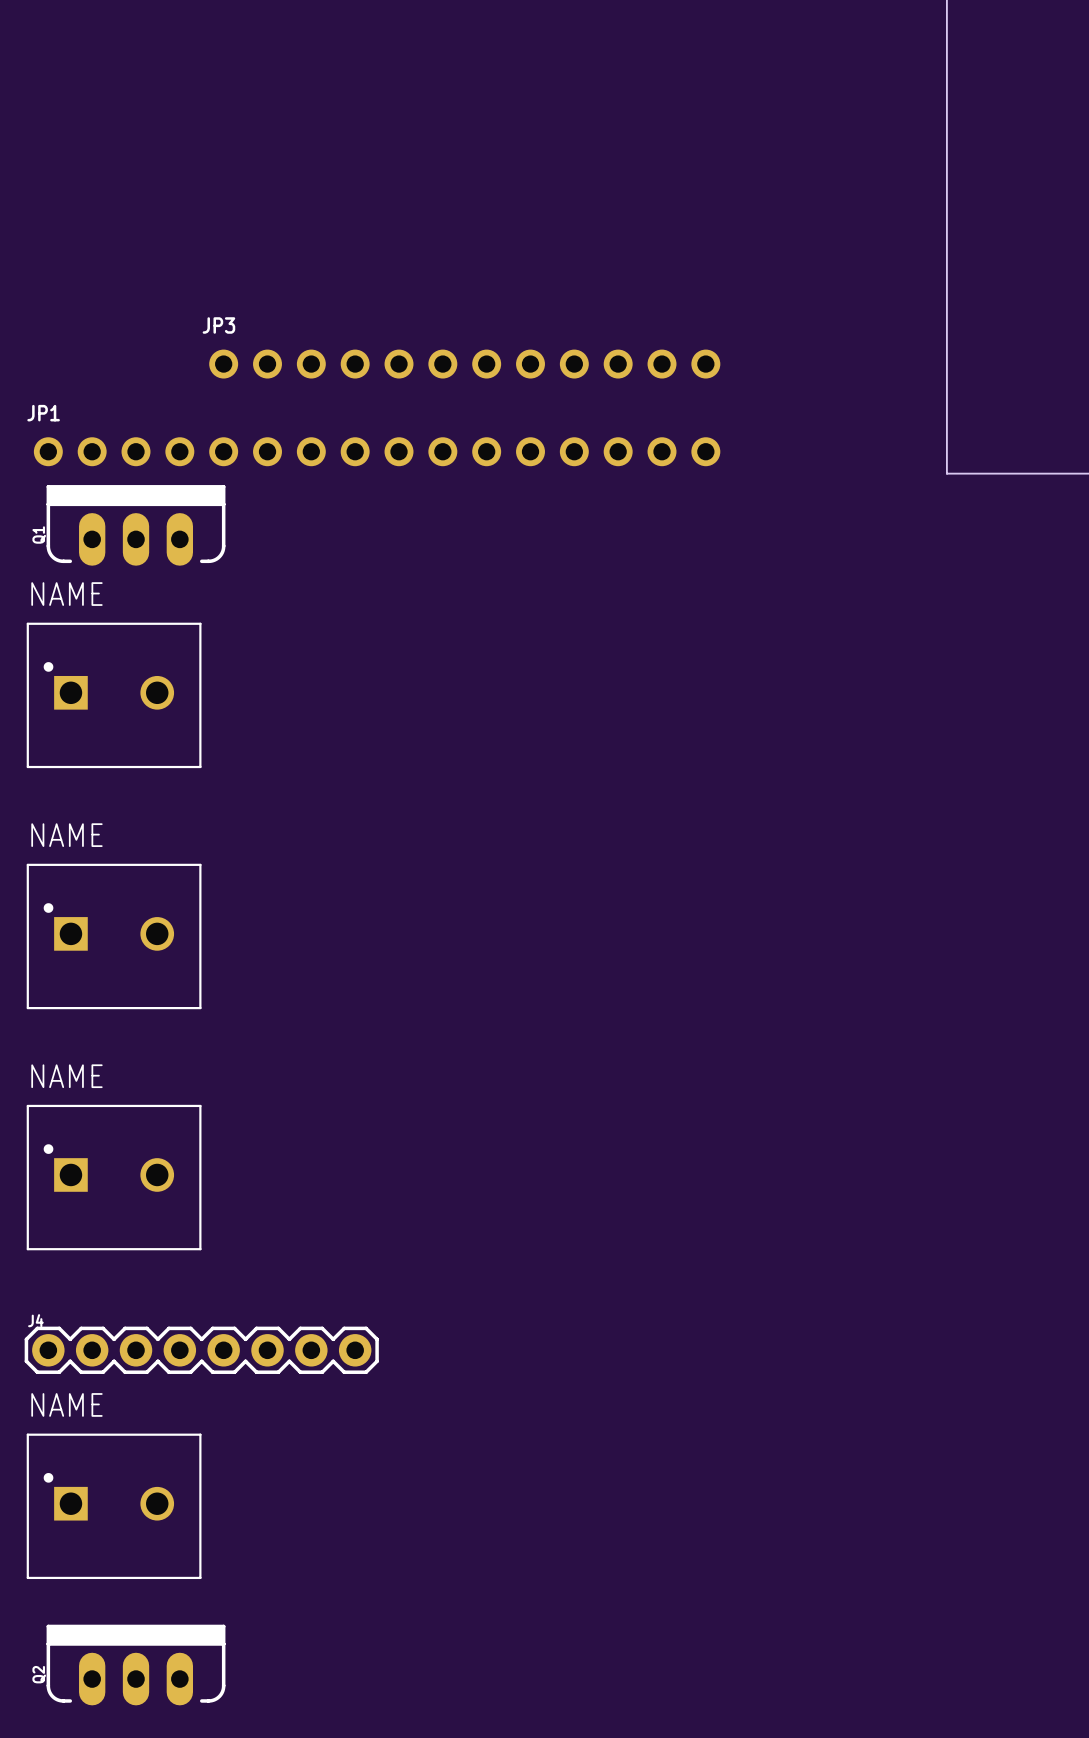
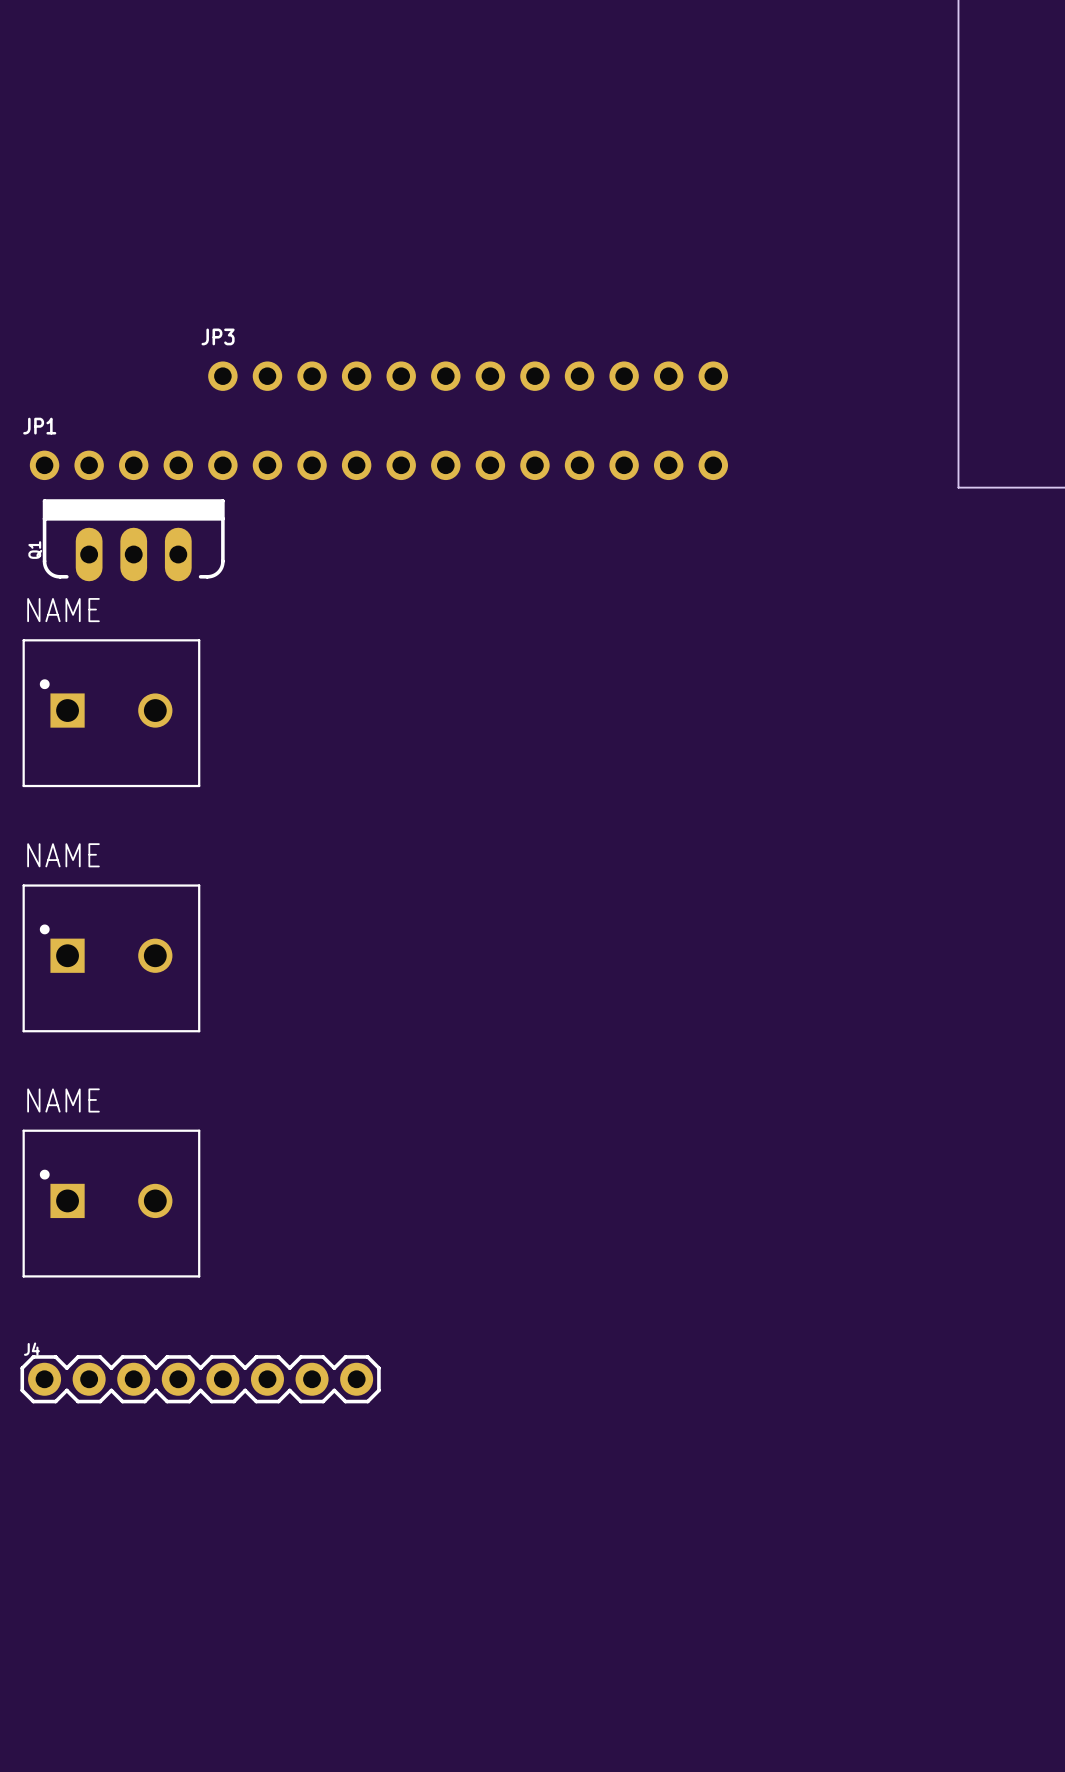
part: (114, 1506) -> none
Q2: (136, 1665) -> none

